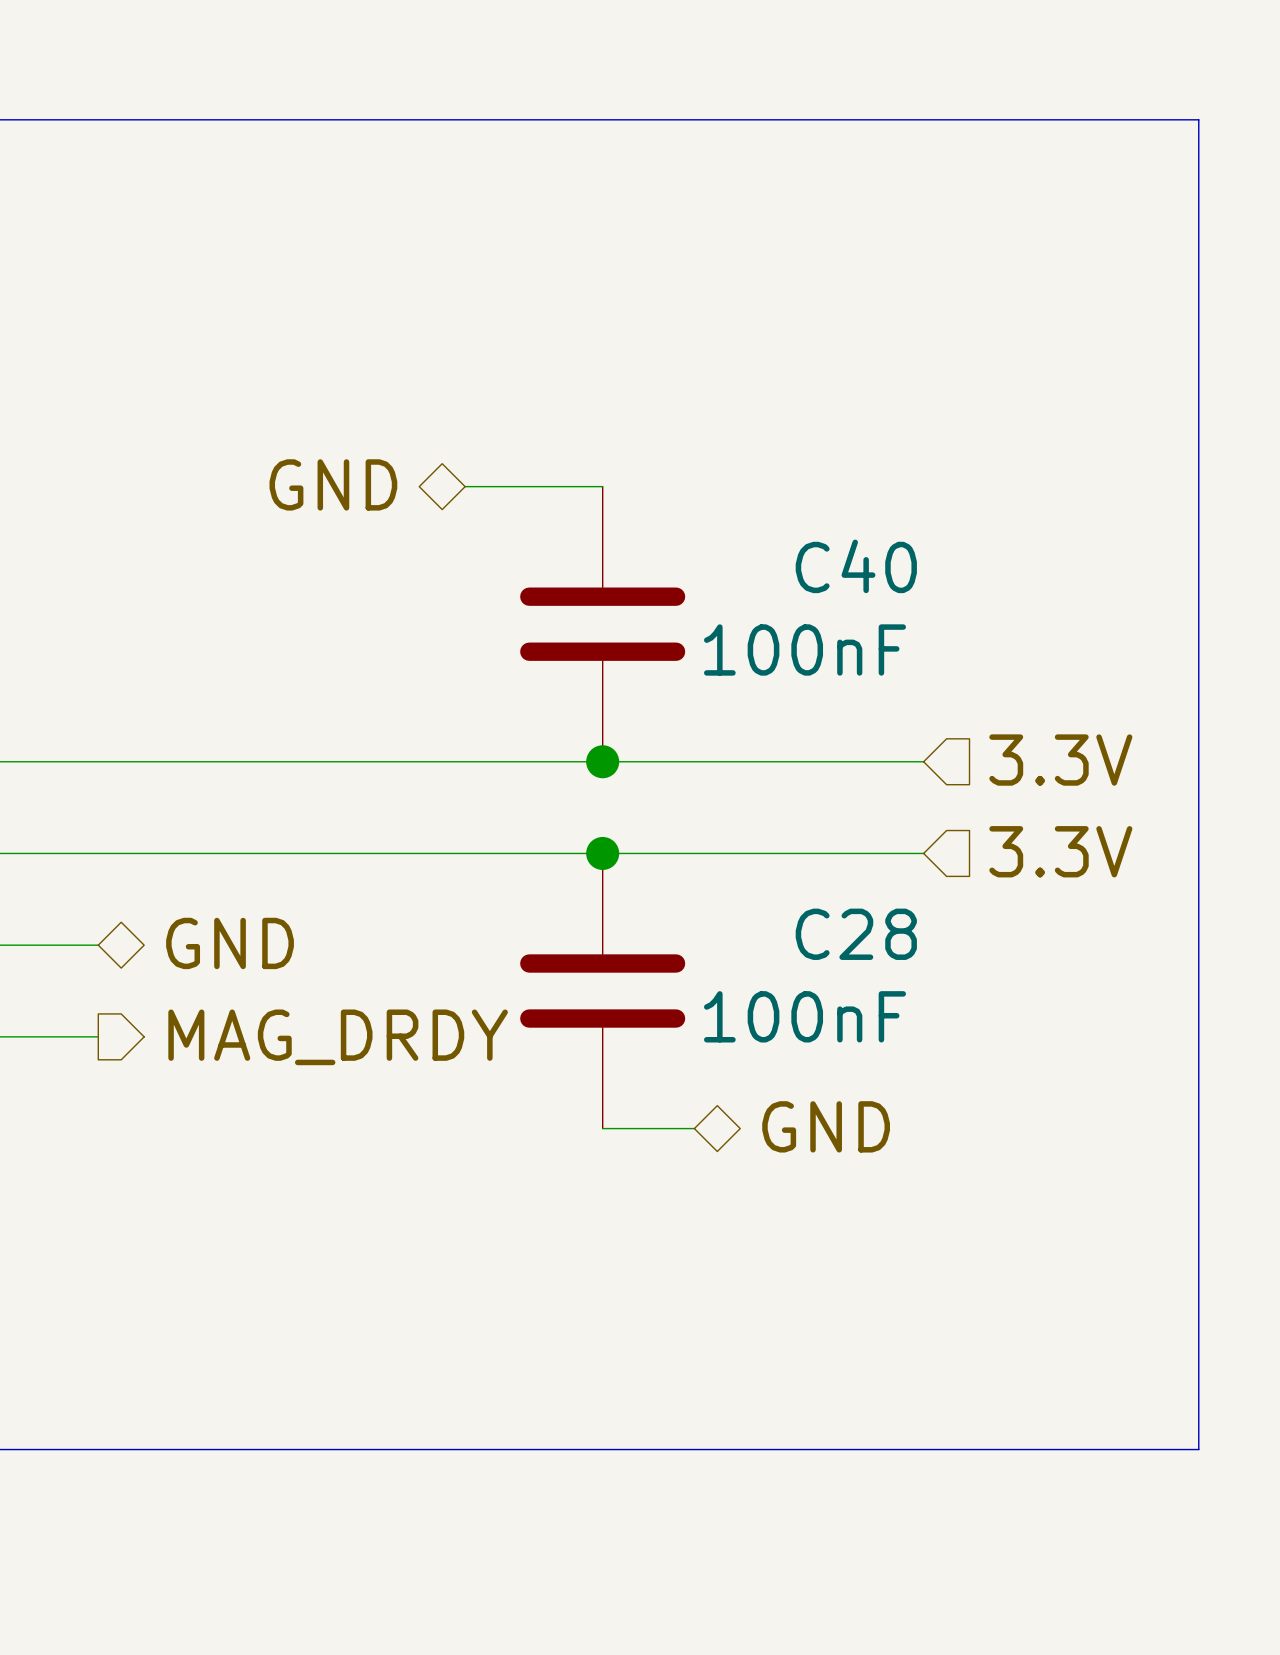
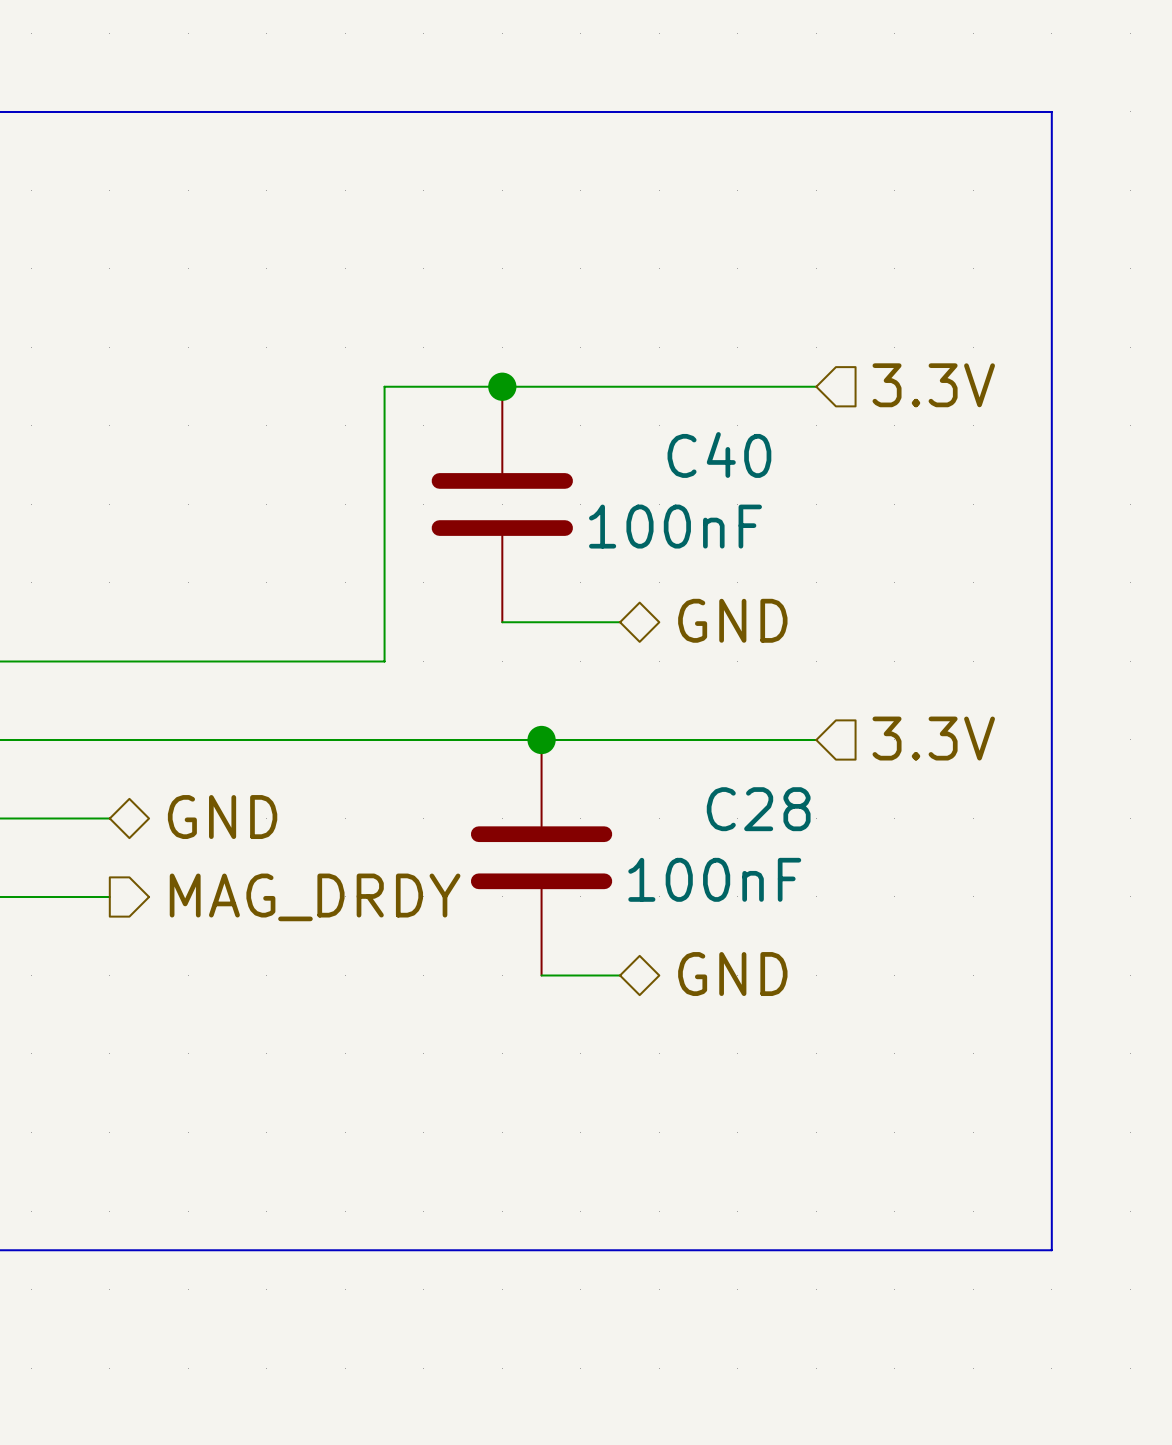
junction: none -> (502, 386)
hierarchical label rotation: 0° (333, 484) -> 180° (732, 620)
hierarchical label position: GND (333, 484) -> GND (732, 620)
wire: (465, 486) (602, 486) -> (502, 622) (620, 622)
C40 position: (602, 624) -> (502, 504)
hierarchical label position: 3.3V (1060, 760) -> 3.3V (933, 385)
wire: (419, 761) (923, 761) -> (384, 661) (384, 386) (816, 386)
junction: (602, 761) -> none

